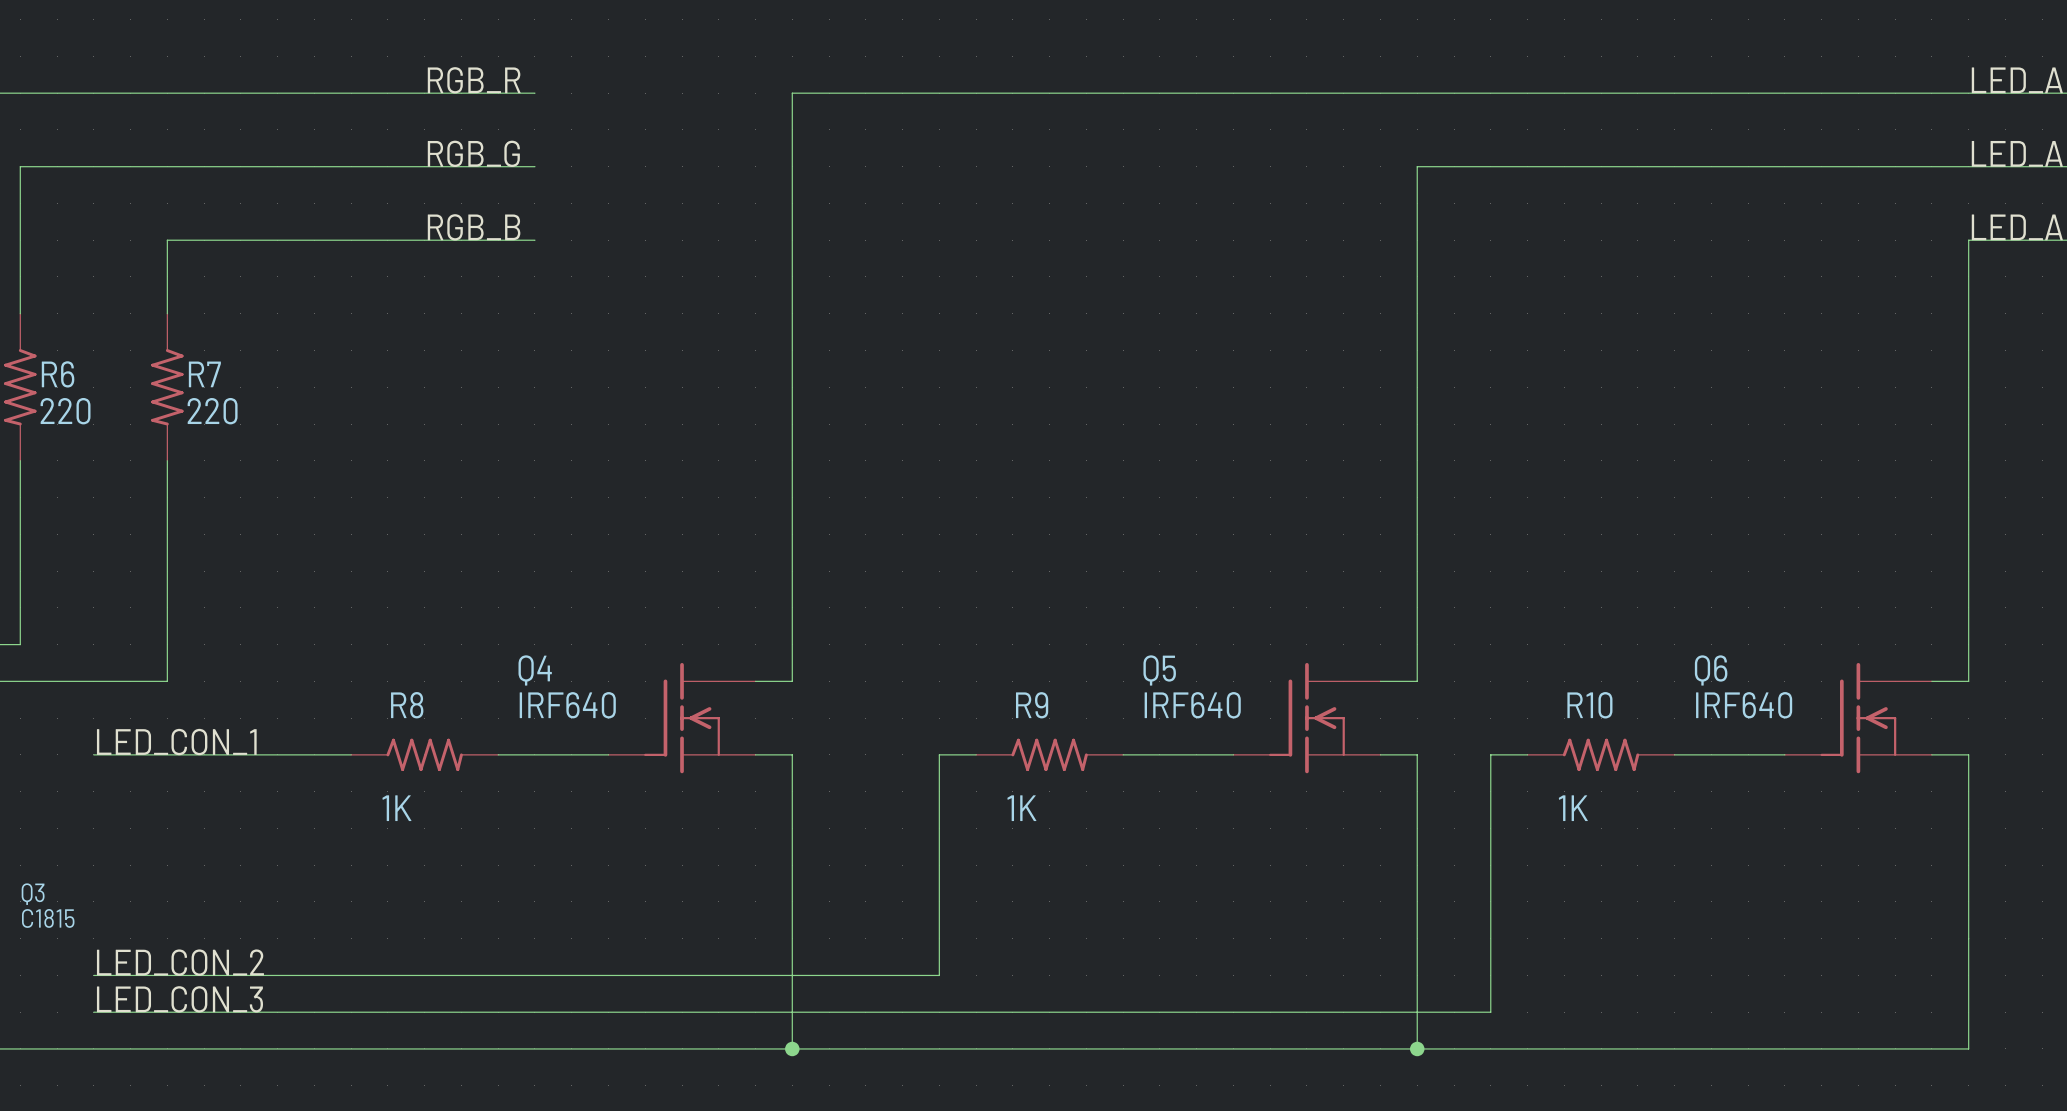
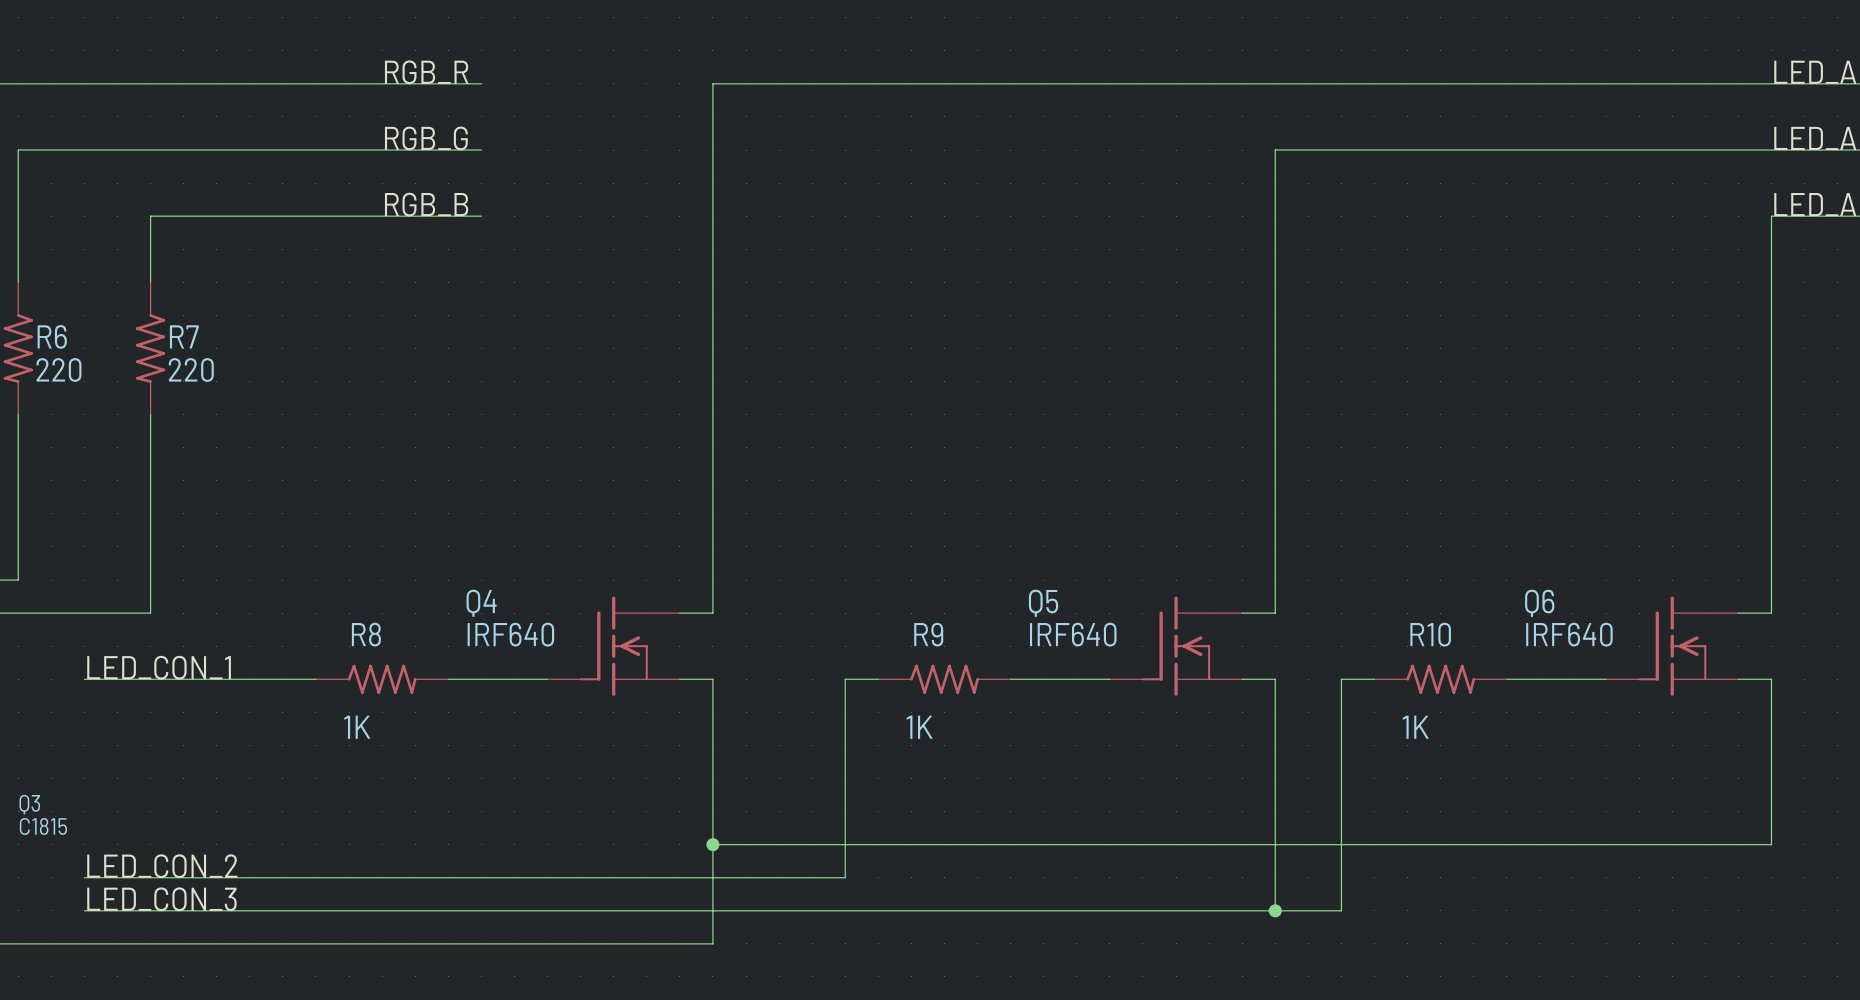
junction: none -> (712, 844)
wire: (1968, 938) (1968, 1048) (792, 1048) -> (1771, 844) (712, 844)
wire: (1417, 1012) (1417, 1048) -> none
junction: (792, 1048) -> none
junction position: (1417, 1048) -> (1275, 910)

